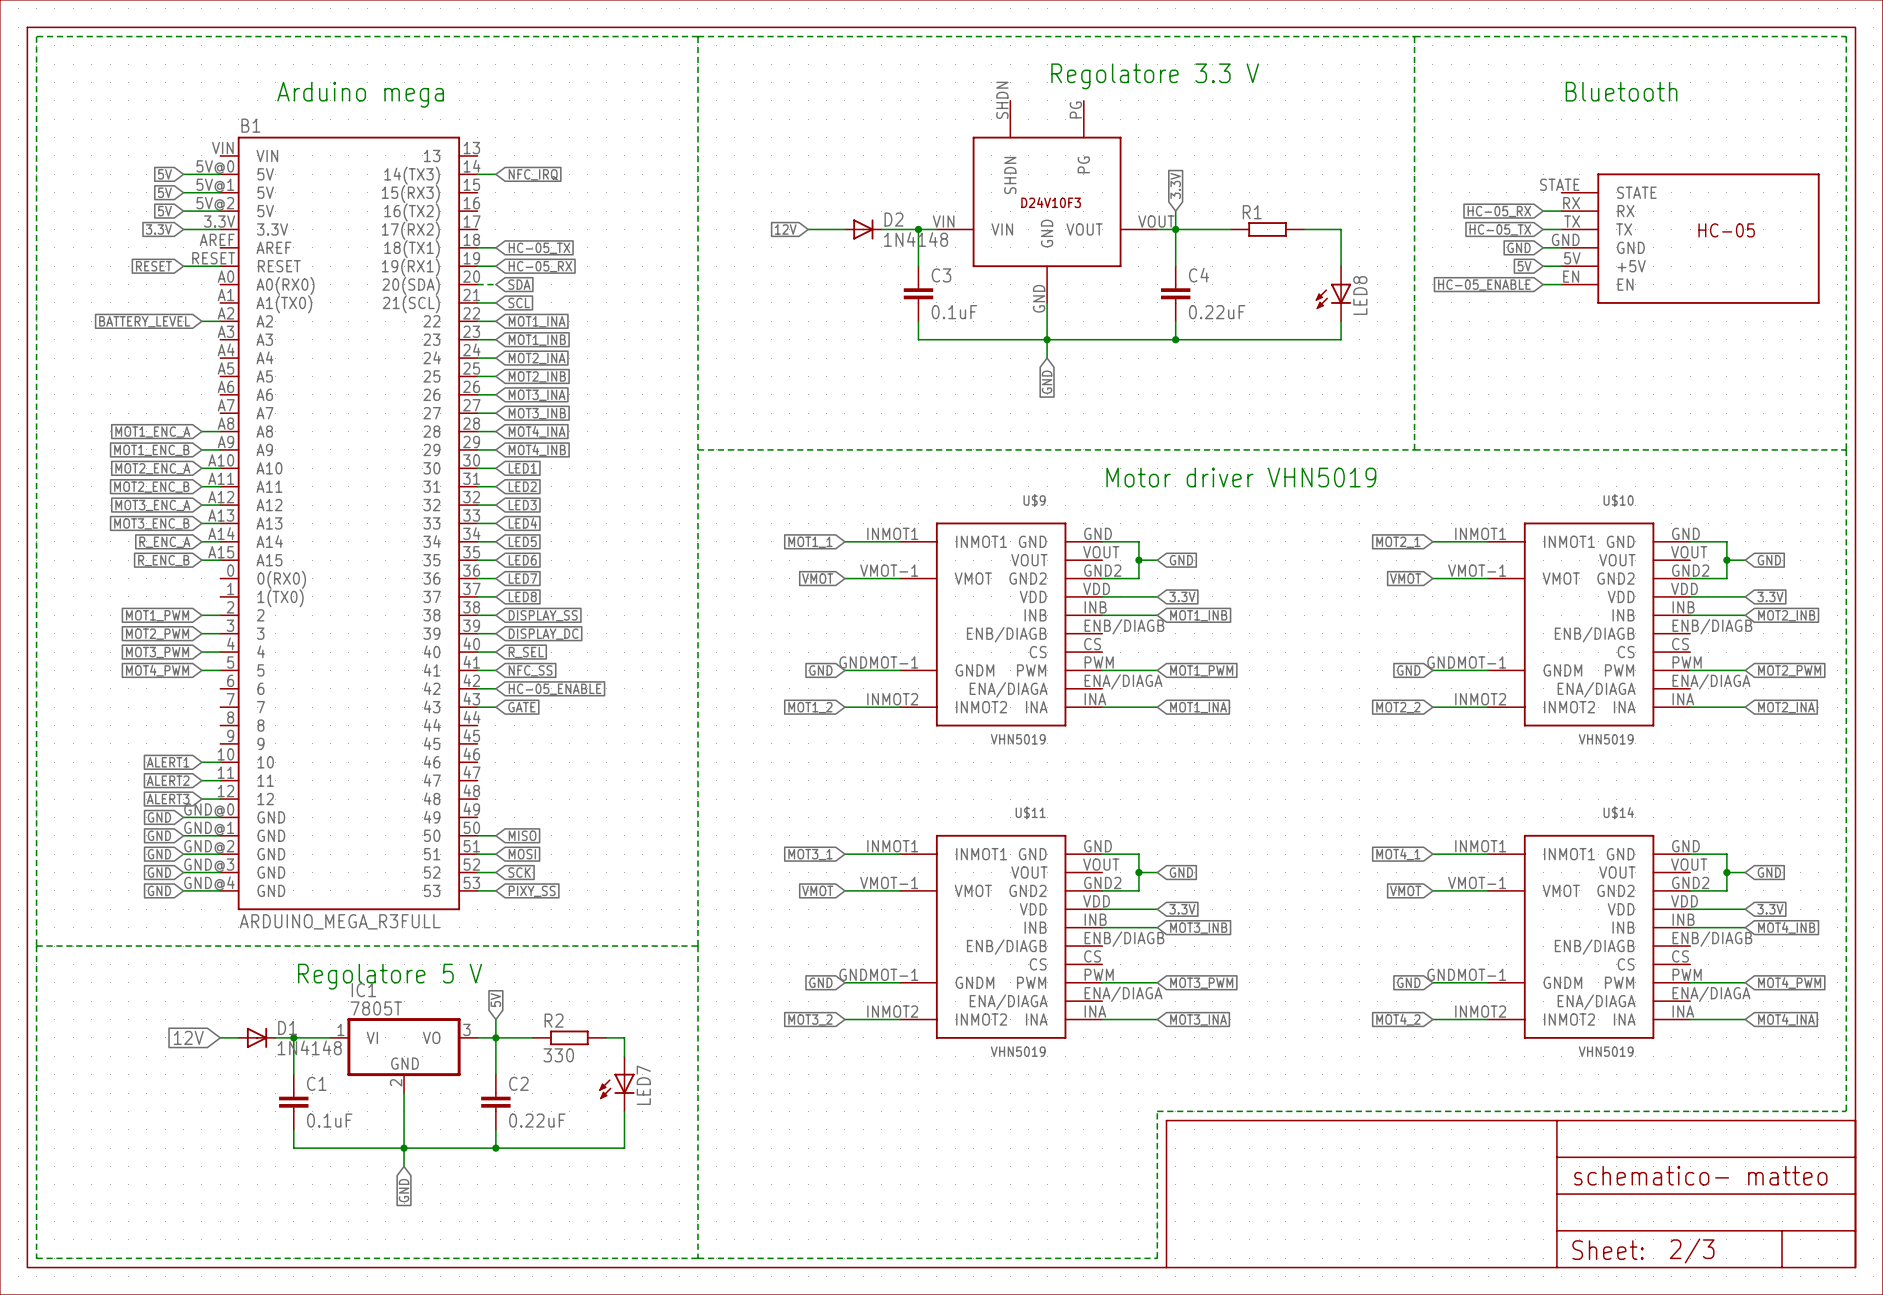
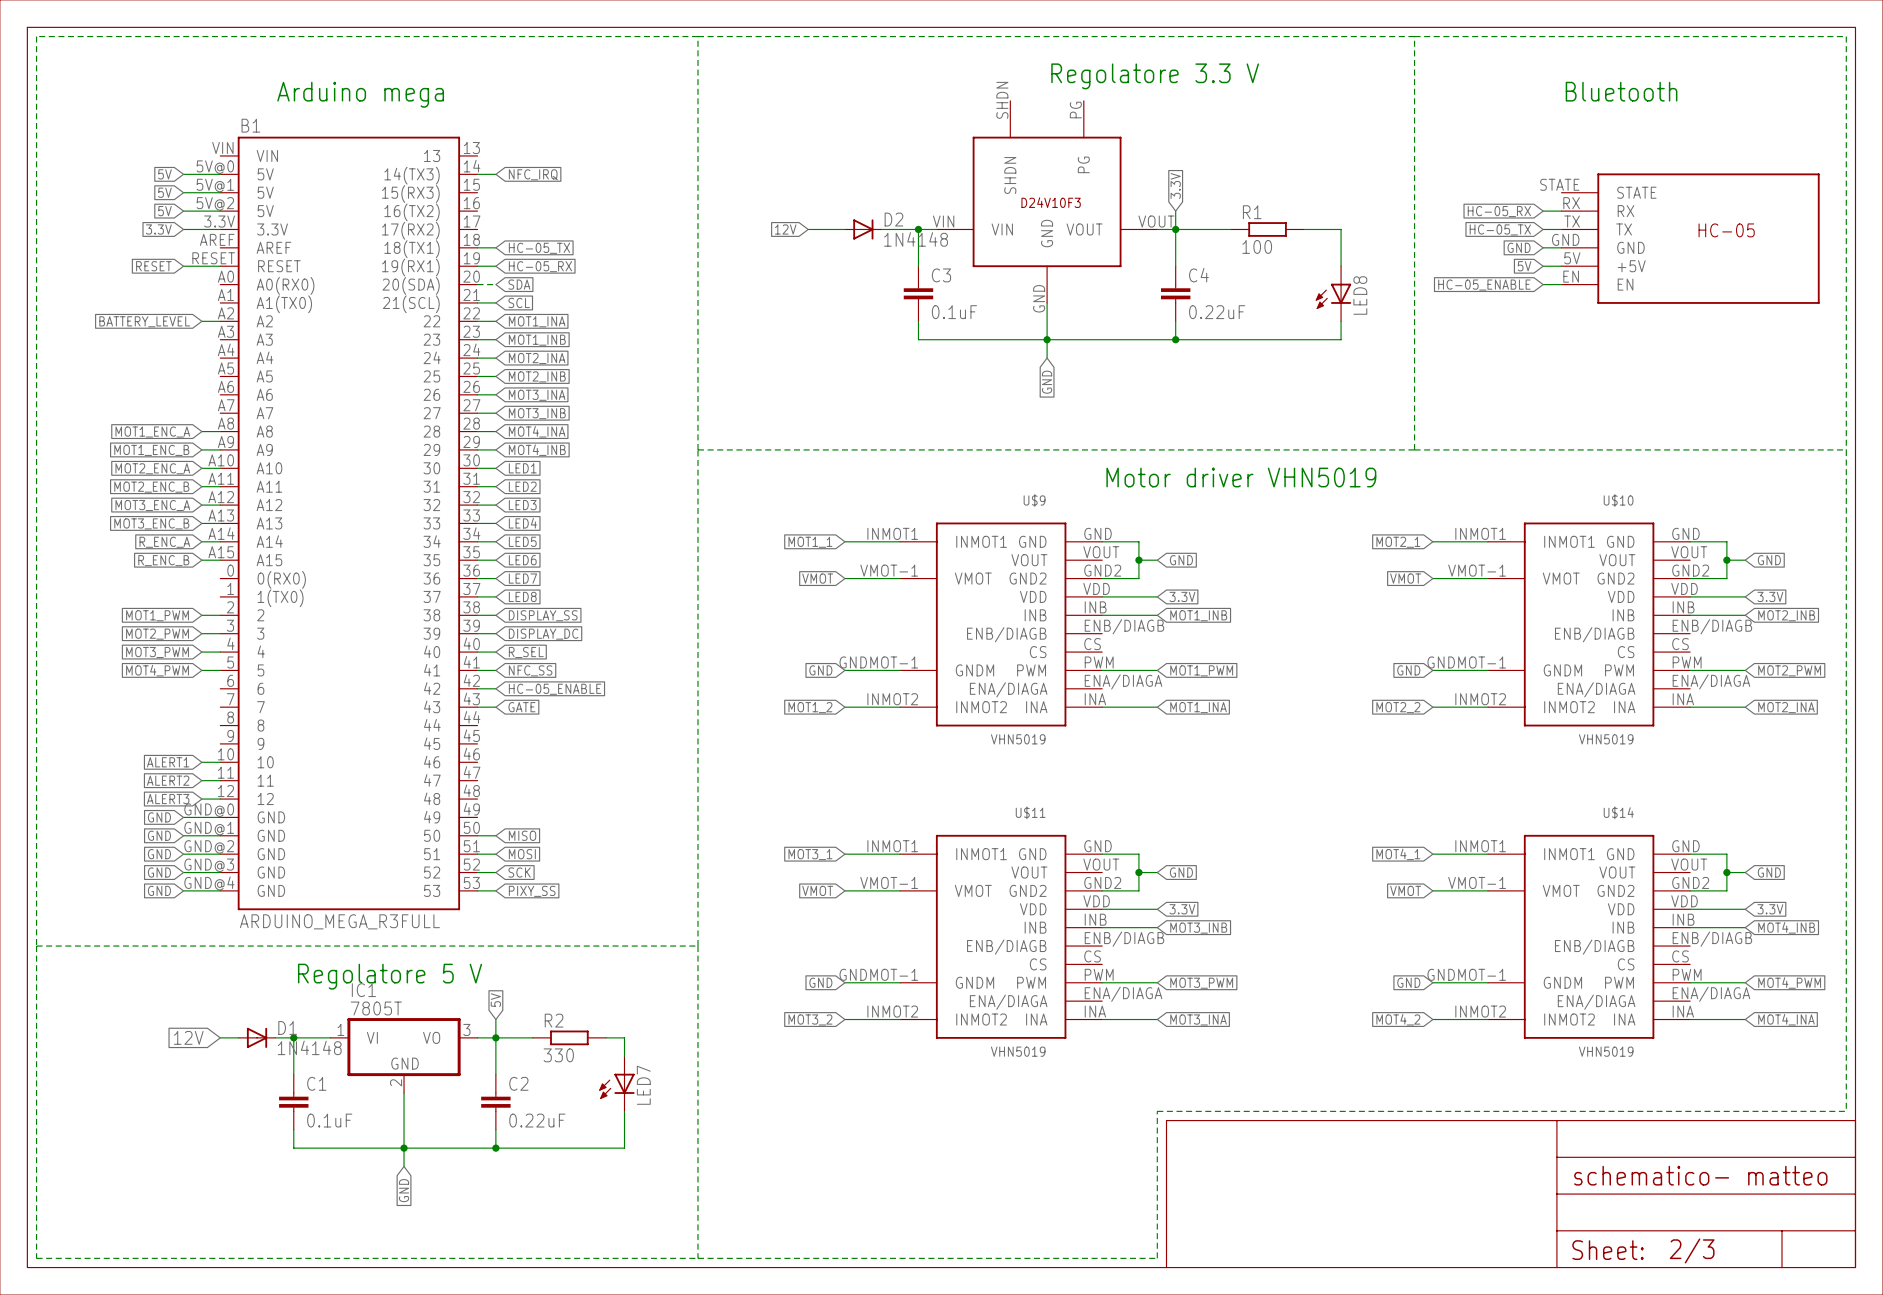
R1 value: none -> 100 (1257, 246)

